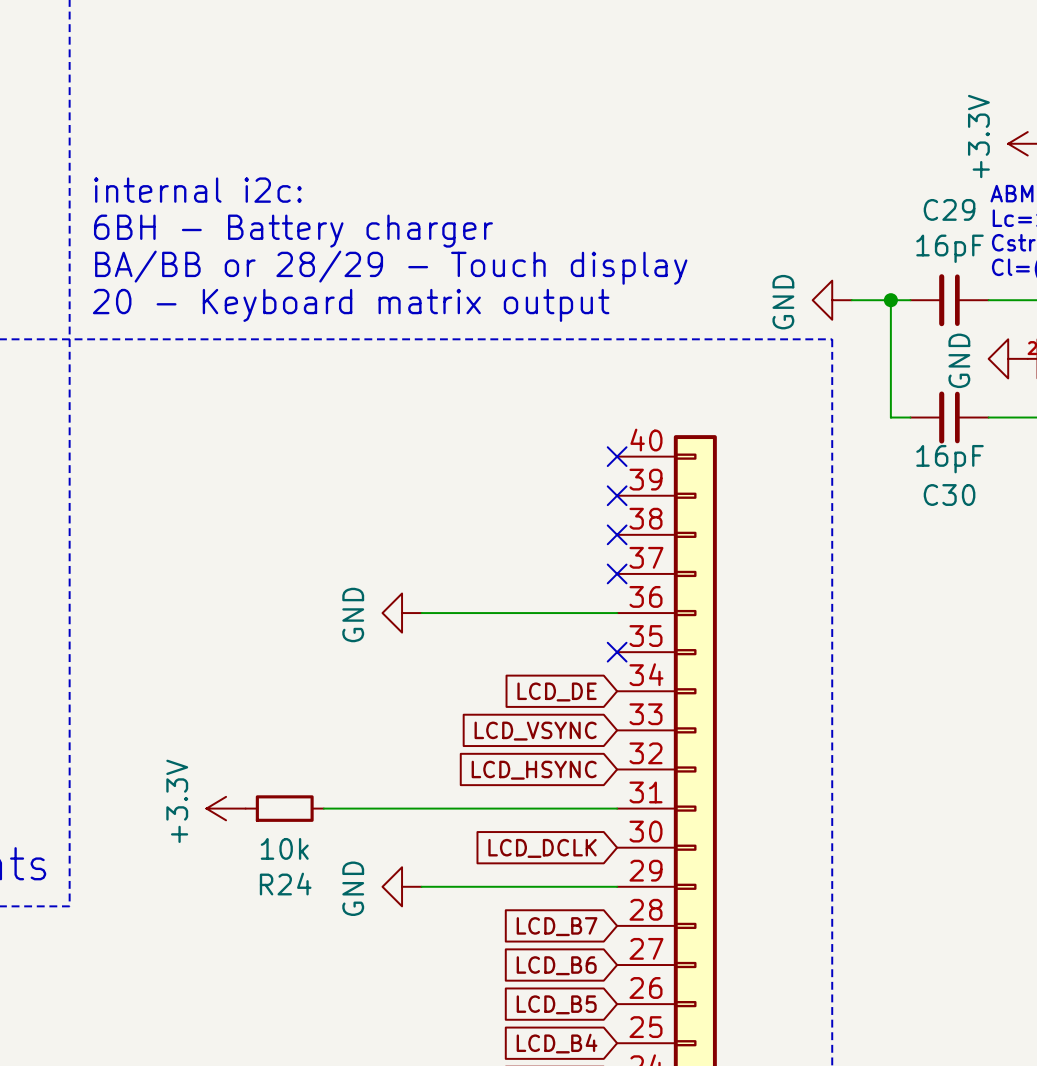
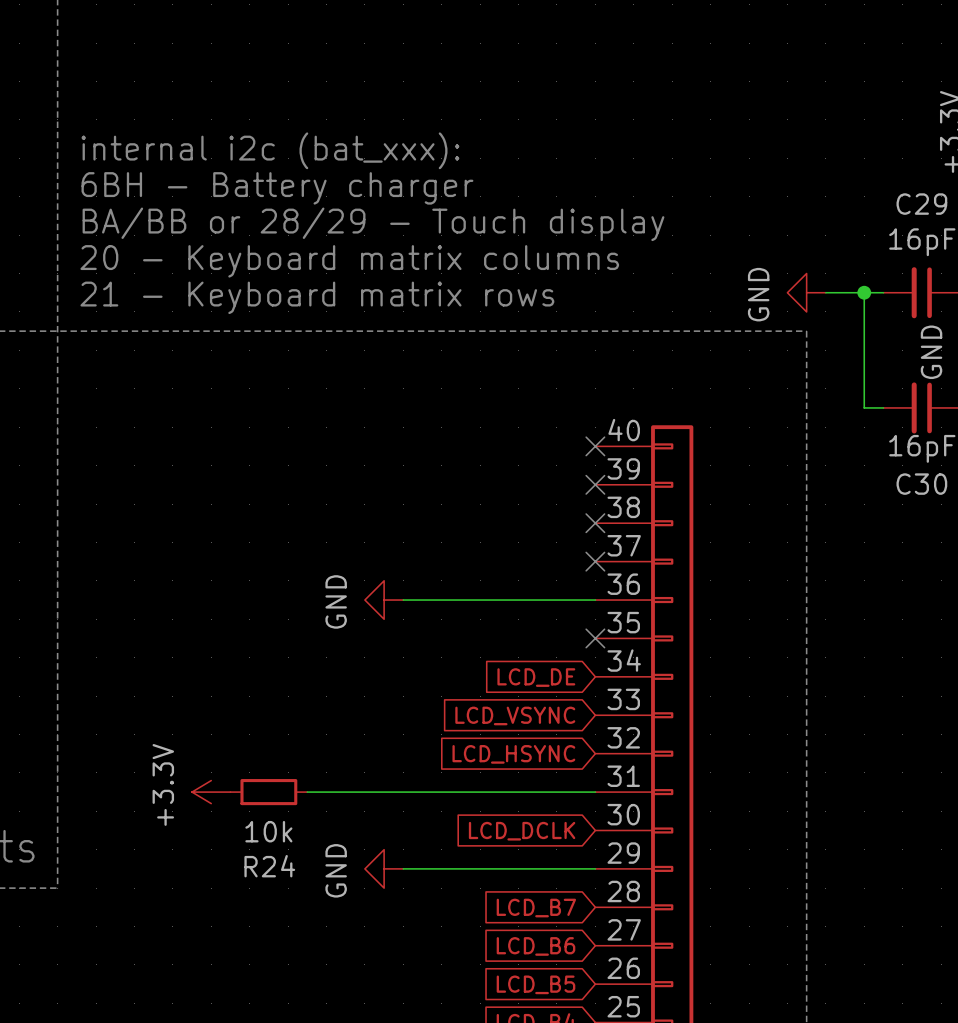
text: none -> internal i2c (bat_xxx): (270, 150)
text: internal i2c: (197, 190) -> 6BH - Battery charger (277, 188)
text: 6BH - Battery charger (293, 231) -> BA/BB or 28/29 - Touch display (373, 224)
text: BA/BB or 28/29 - Touch display (391, 267) -> 20 - Keyboard matrix columns (349, 261)
text: 20 - Keyboard matrix output (351, 305) -> 21 - Keyboard matrix rows (317, 297)

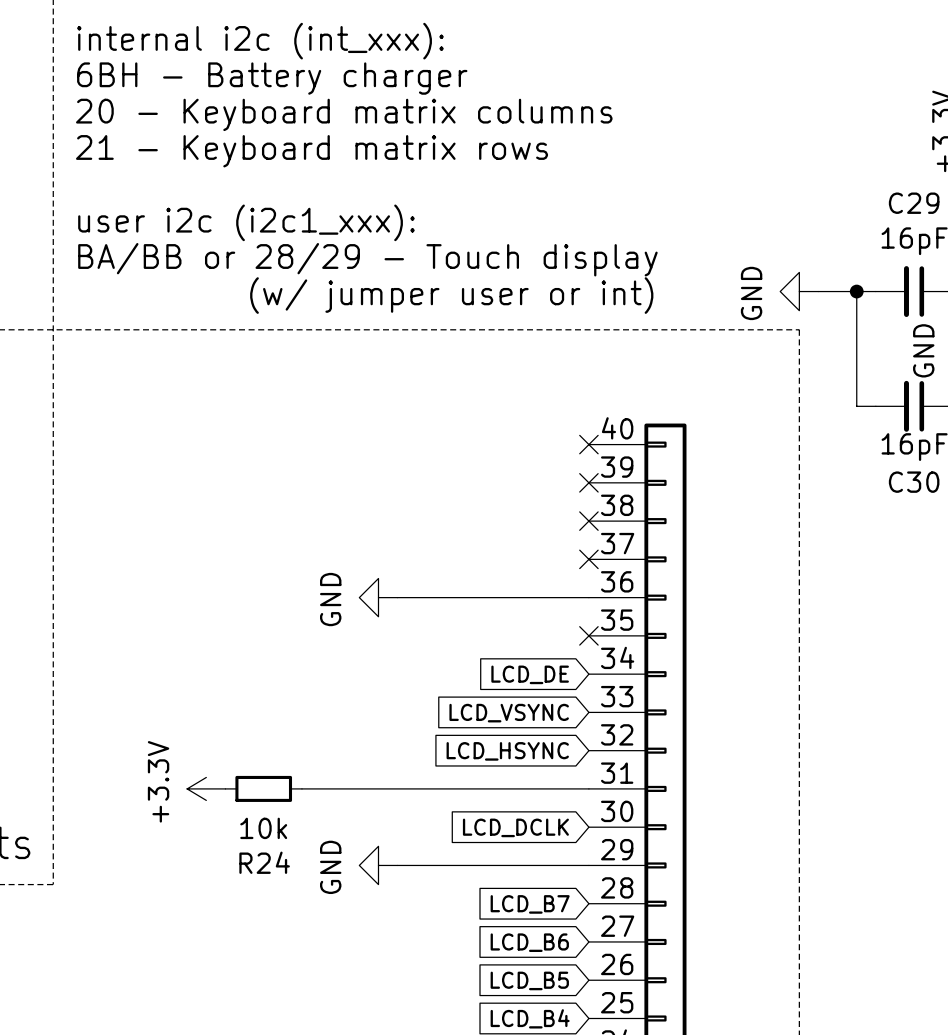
text: none -> internal i2c (int_xxx): (260, 41)
text: none -> 20 - Keyboard matrix columns (344, 114)
text: internal i2c (bat_xxx): (270, 150) -> 21 - Keyboard matrix rows (312, 151)
text position: 6BH - Battery charger (277, 188) -> 6BH - Battery charger (272, 78)
text: BA/BB or 28/29 - Touch display (373, 224) -> user i2c (i2c1_xxx): (246, 222)
text: 20 - Keyboard matrix columns (349, 261) -> BA/BB or 28/29 - Touch display (367, 259)
text: 21 - Keyboard matrix rows (317, 297) -> (w/ jumper user or int) (451, 295)

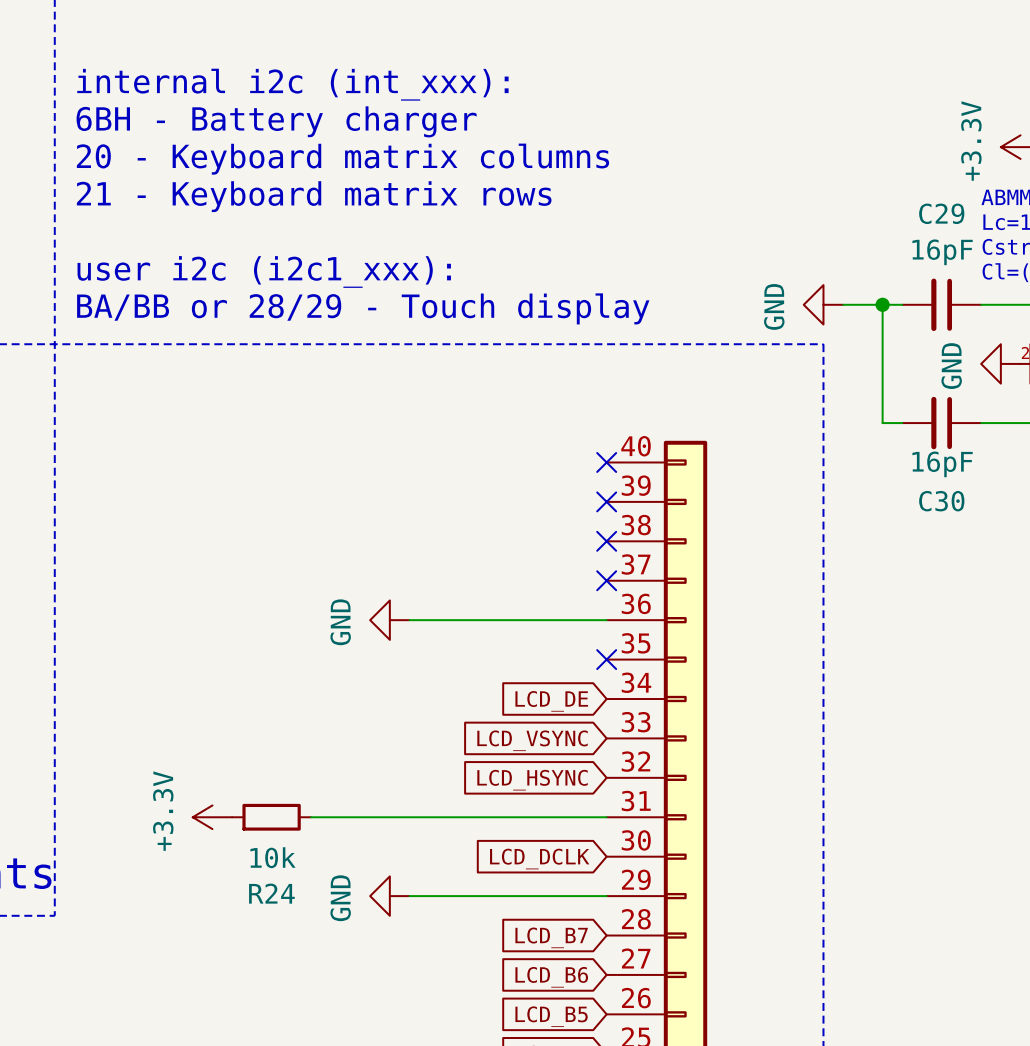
text: internal i2c (int_xxx): (260, 41) -> none
text: 6BH - Battery charger (272, 78) -> internal i2c (int_xxx): (292, 84)
text: 20 - Keyboard matrix columns (344, 114) -> 6BH - Battery charger (276, 121)
text: 21 - Keyboard matrix rows (312, 151) -> 20 - Keyboard matrix columns (342, 159)
text: none -> 21 - Keyboard matrix rows (314, 196)
text: user i2c (i2c1_xxx): (246, 222) -> none
text: BA/BB or 28/29 - Touch display (367, 259) -> user i2c (i2c1_xxx): (264, 271)
text: (w/ jumper user or int) (451, 295) -> BA/BB or 28/29 - Touch display (363, 308)

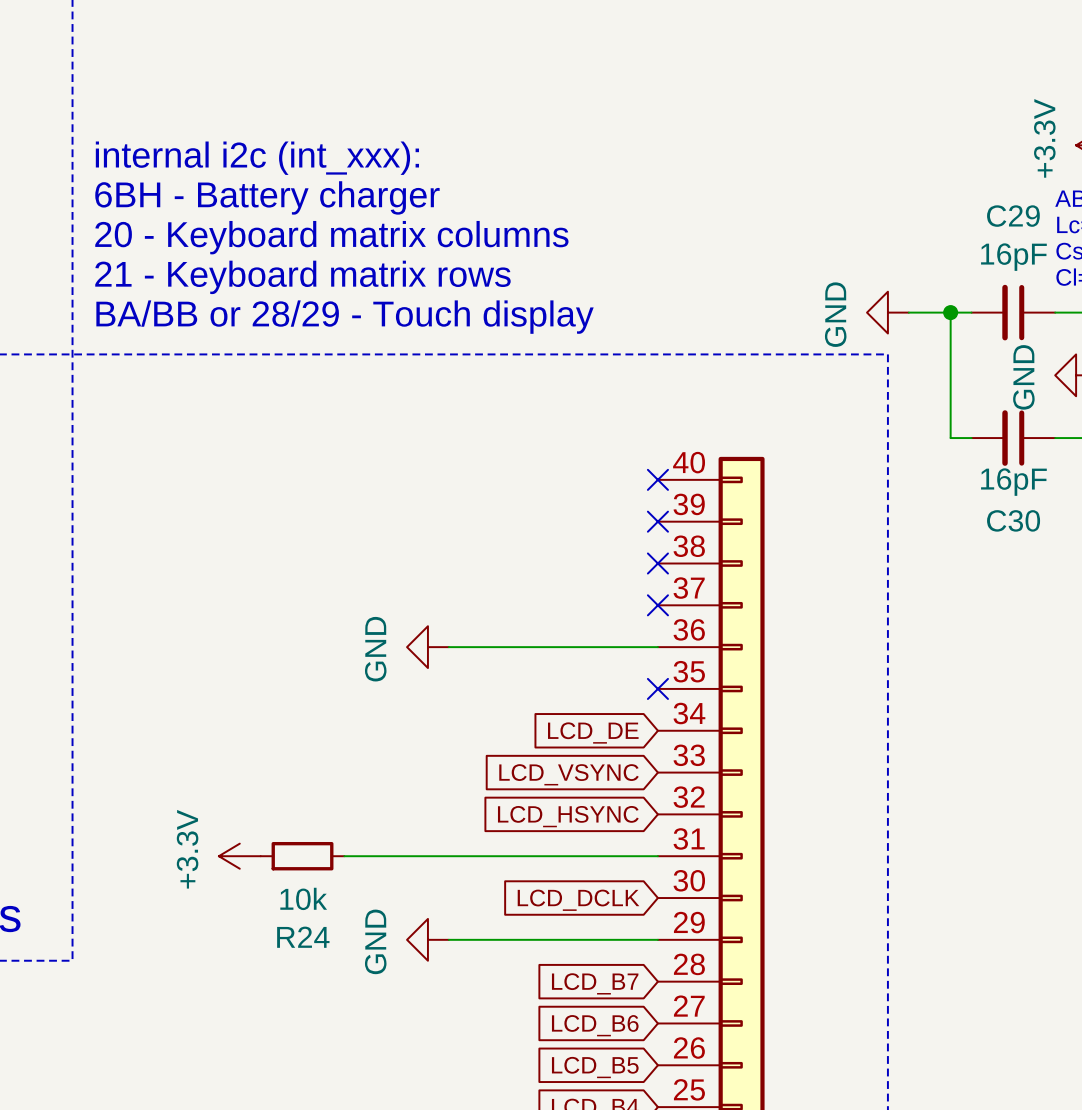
text: internal i2c (int_xxx): (292, 84) -> none
text: 6BH - Battery charger (276, 121) -> none
text: 20 - Keyboard matrix columns (342, 159) -> internal i2c (int_xxx): (257, 158)
text: 21 - Keyboard matrix rows (314, 196) -> 6BH - Battery charger (267, 197)
text: none -> 20 - Keyboard matrix columns (331, 237)
text: user i2c (i2c1_xxx): (264, 271) -> 21 - Keyboard matrix rows (302, 277)

